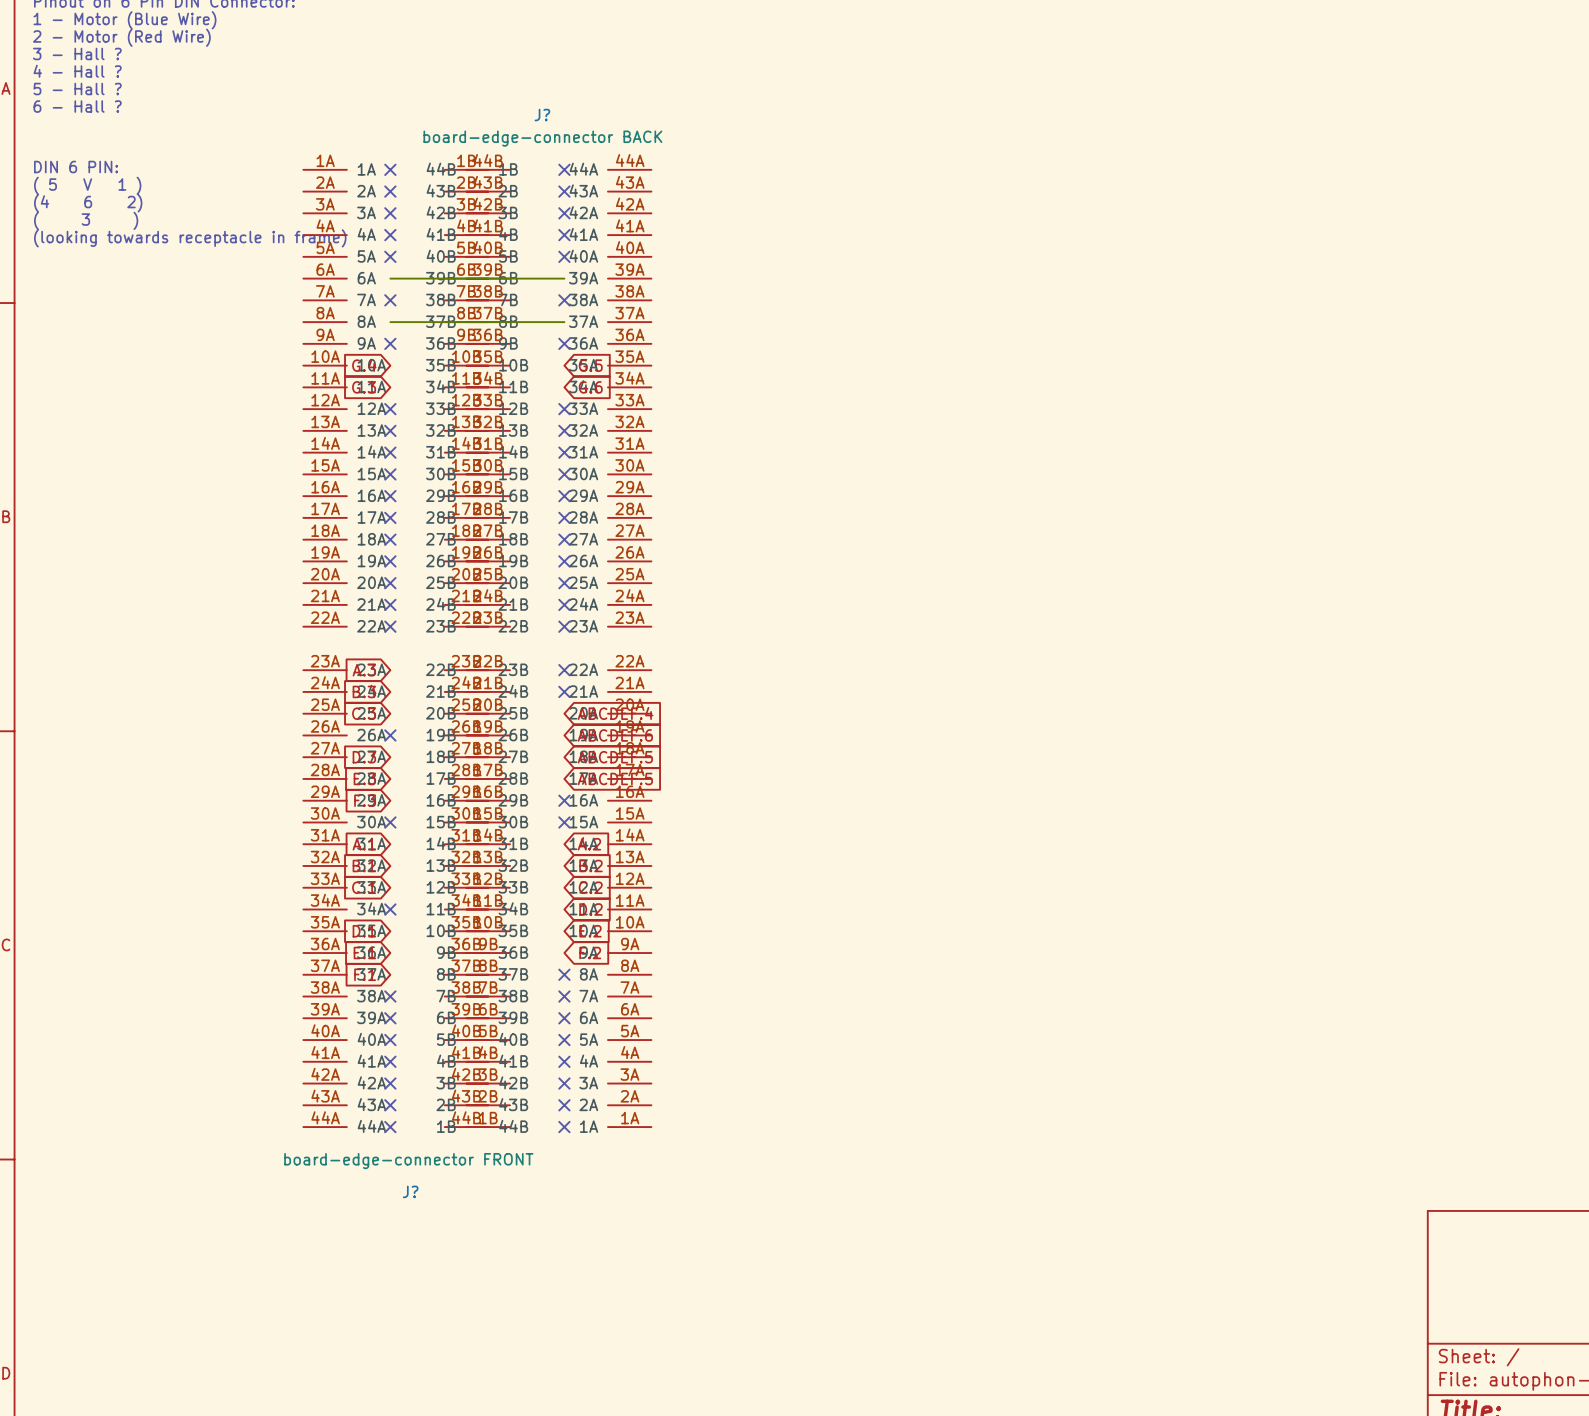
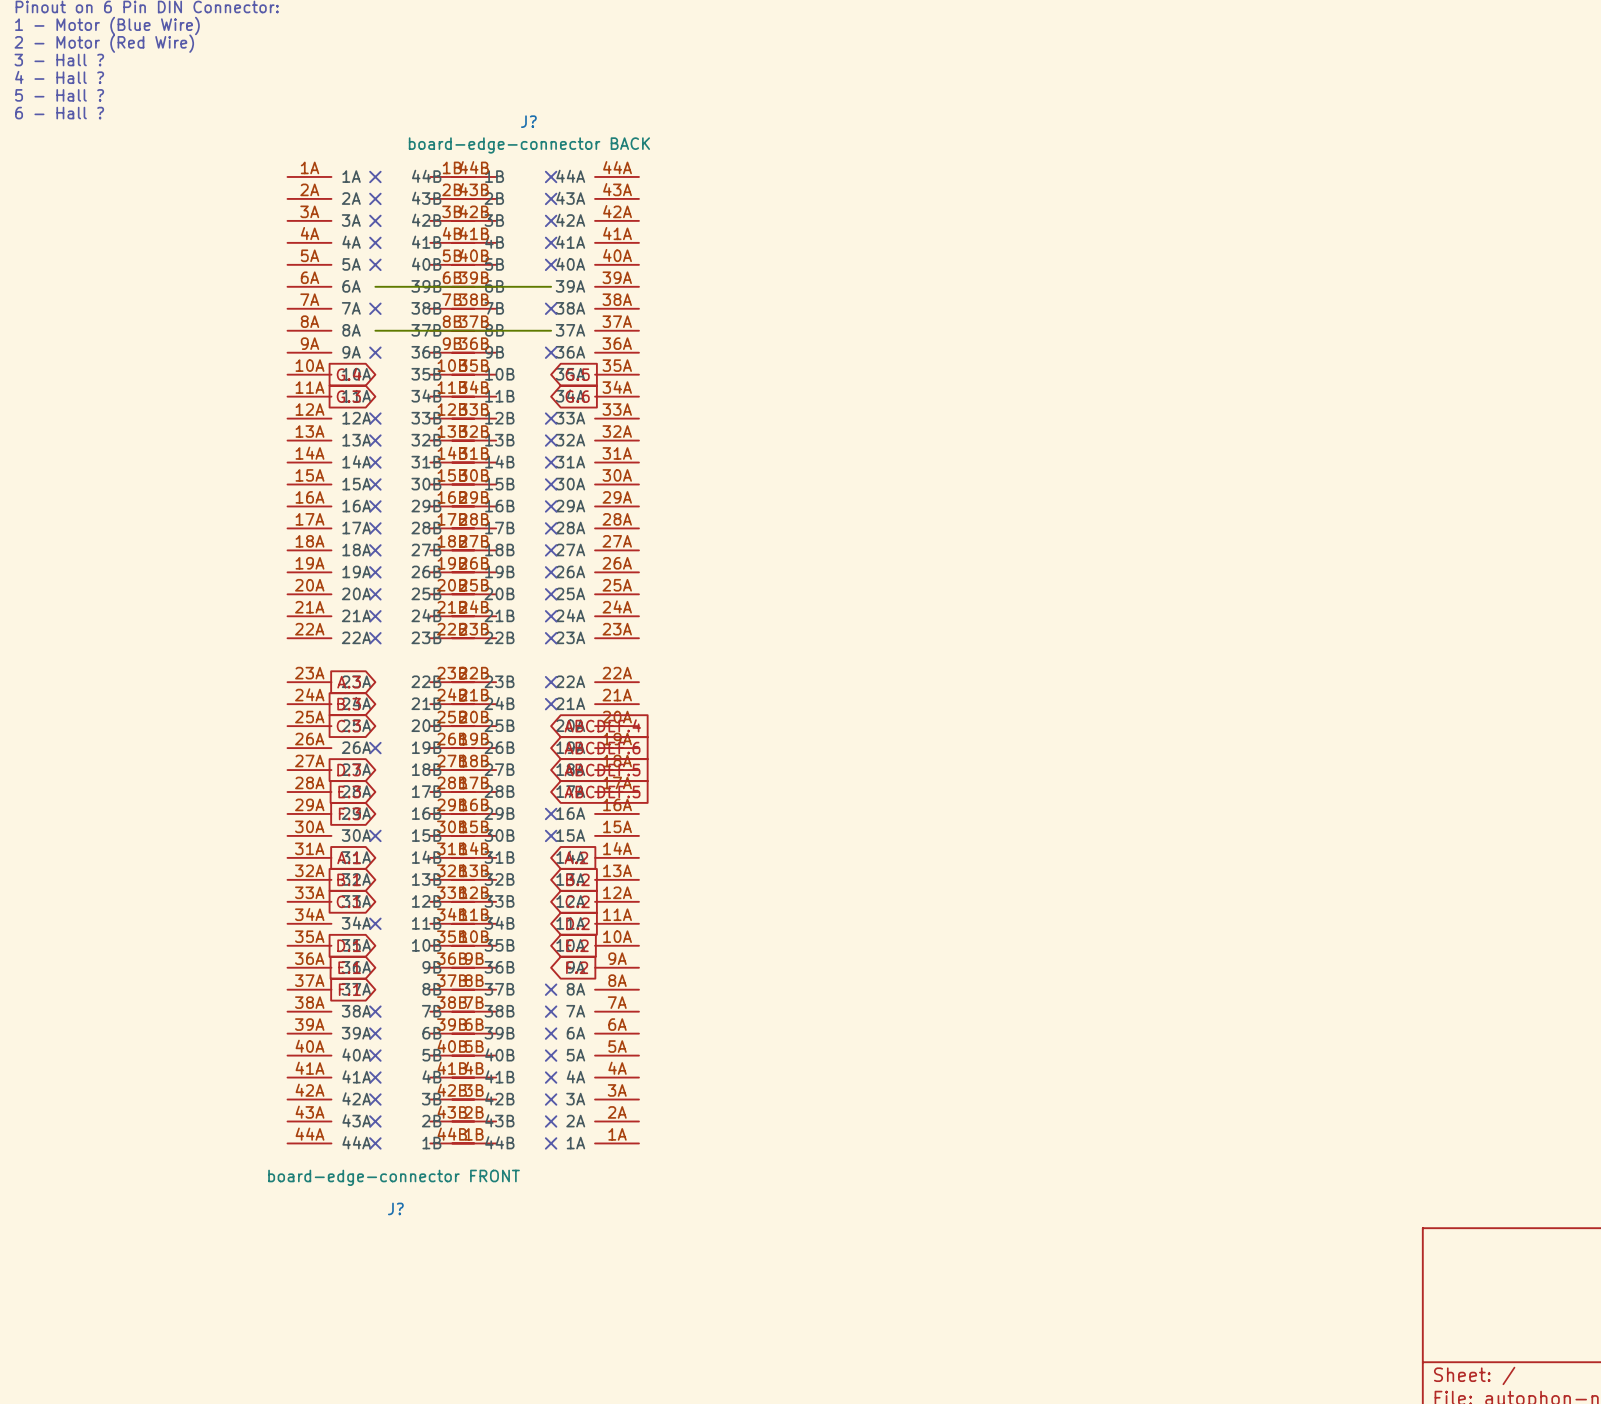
text: DIN 6 PIN: (76, 167) -> none
text: ( 5 V 1 ) (87, 185) -> none
text: (4 6 2) (88, 203) -> none
text: ( 3 ) (86, 220) -> none
text: (looking towards receptacle in frame) (190, 238) -> none

